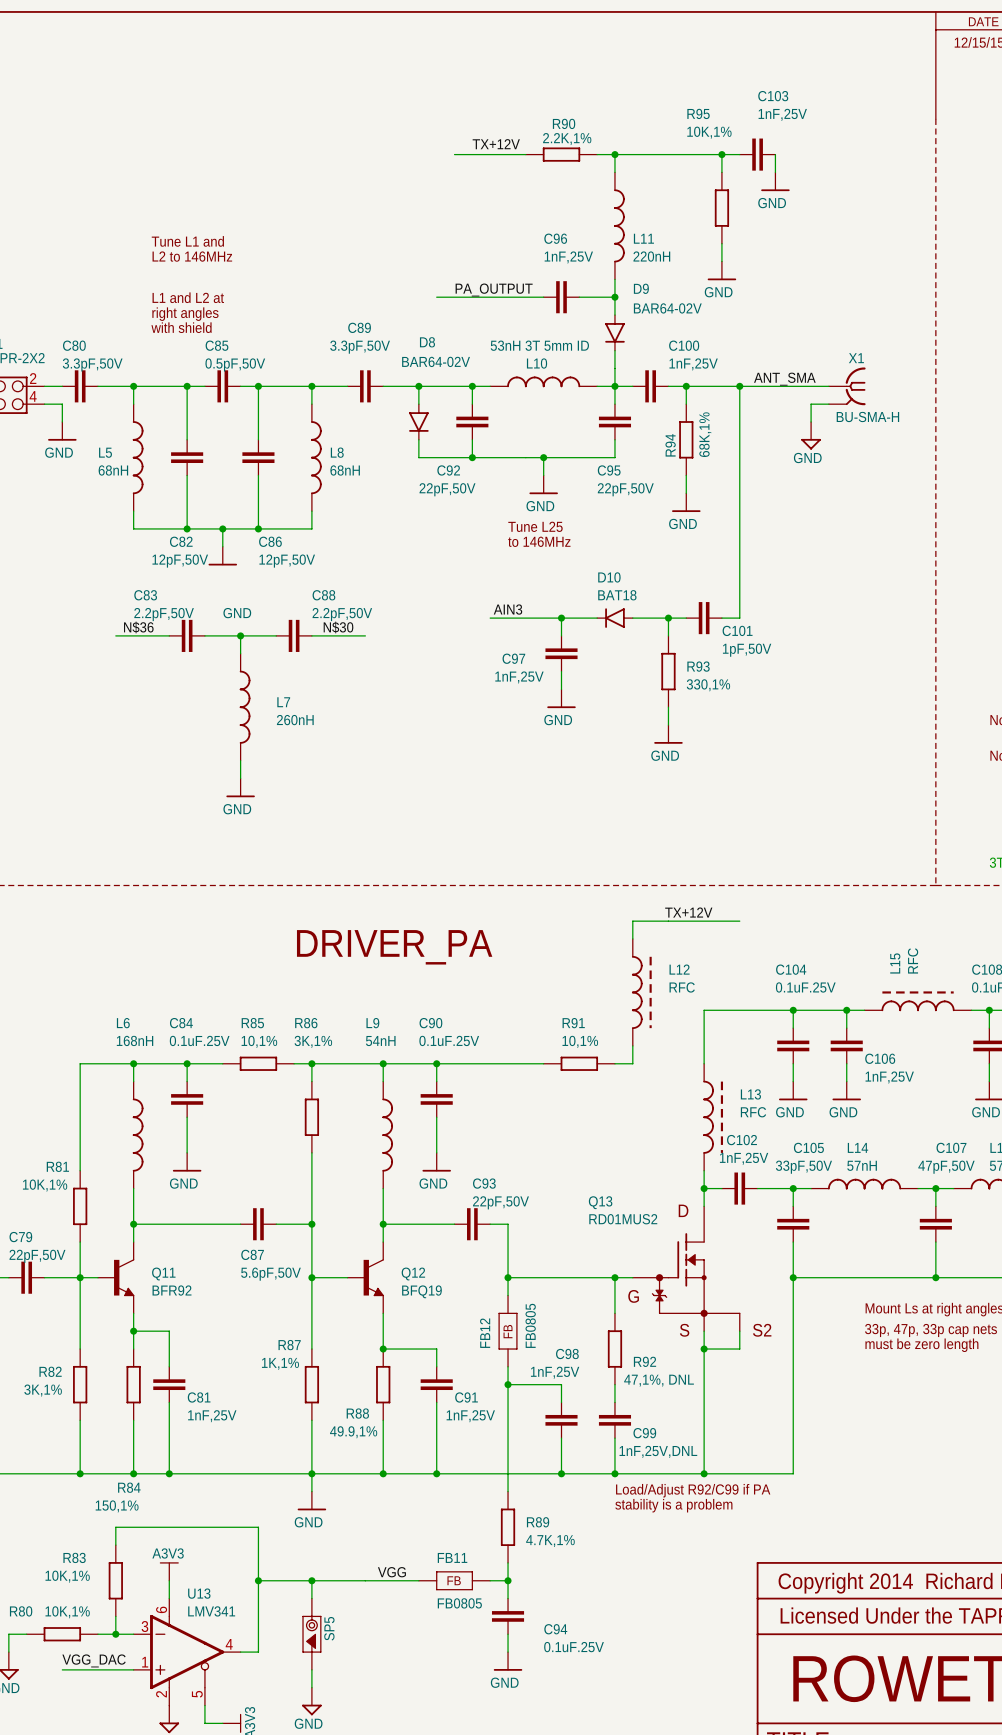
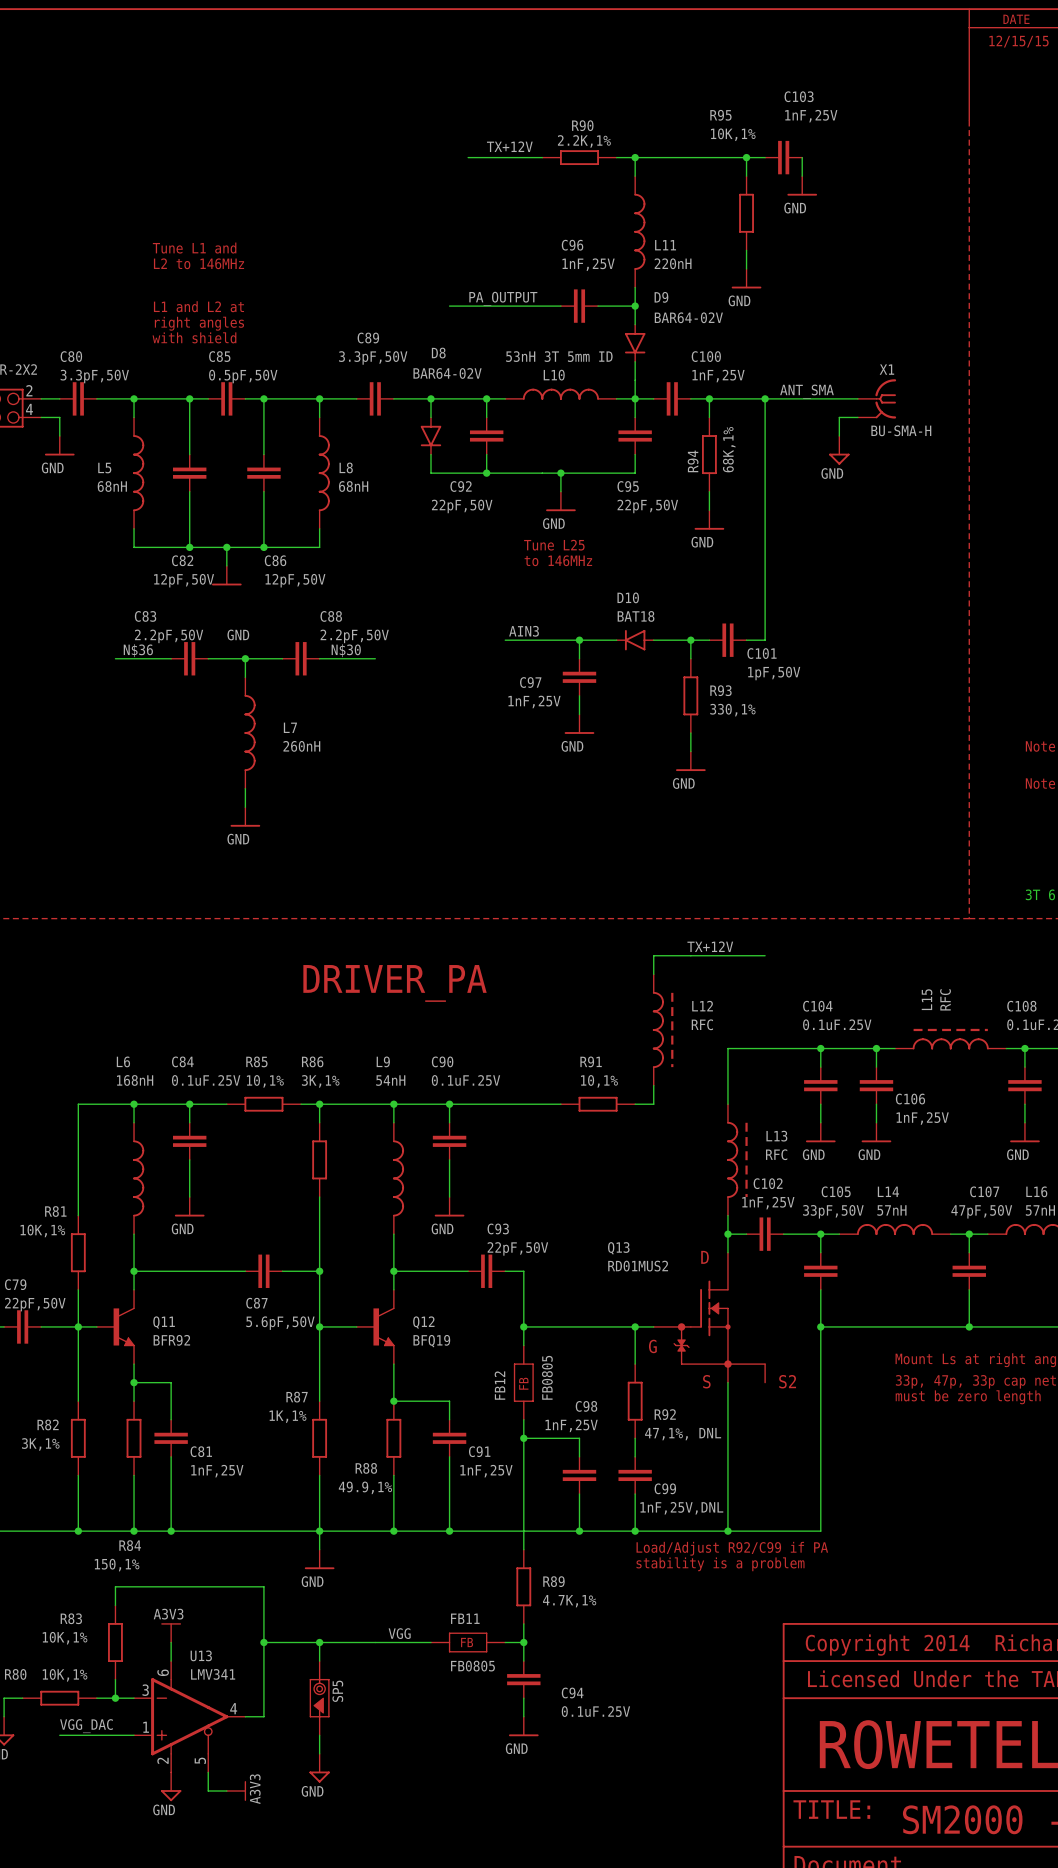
wire: (739, 1331) (739, 1349) (704, 1349) -> none
junction: (704, 1349) -> none

